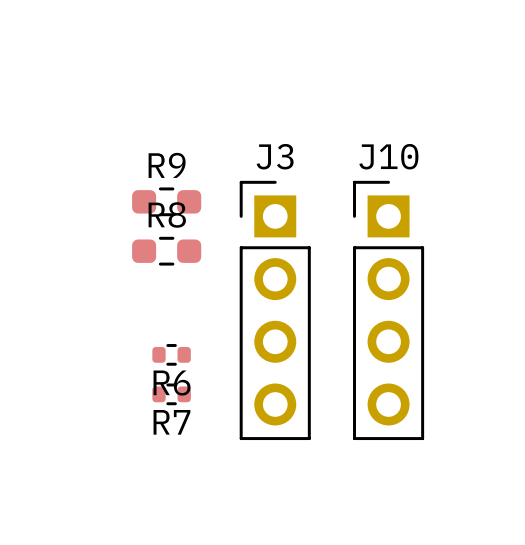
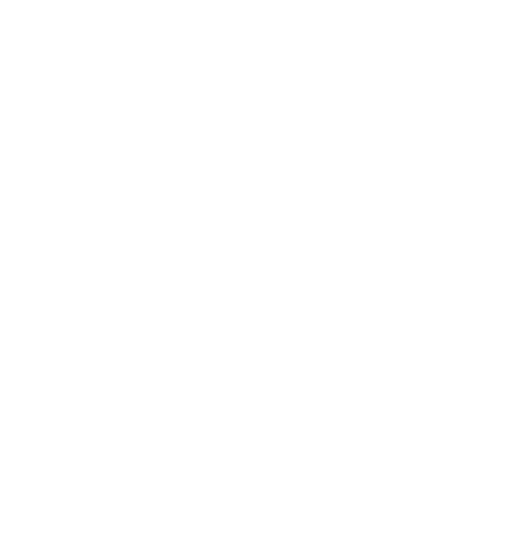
R9: (166, 201) -> none
R8: (166, 251) -> none
J3: (275, 310) -> none
J10: (388, 310) -> none
R6: (171, 354) -> none
R7: (171, 394) -> none

